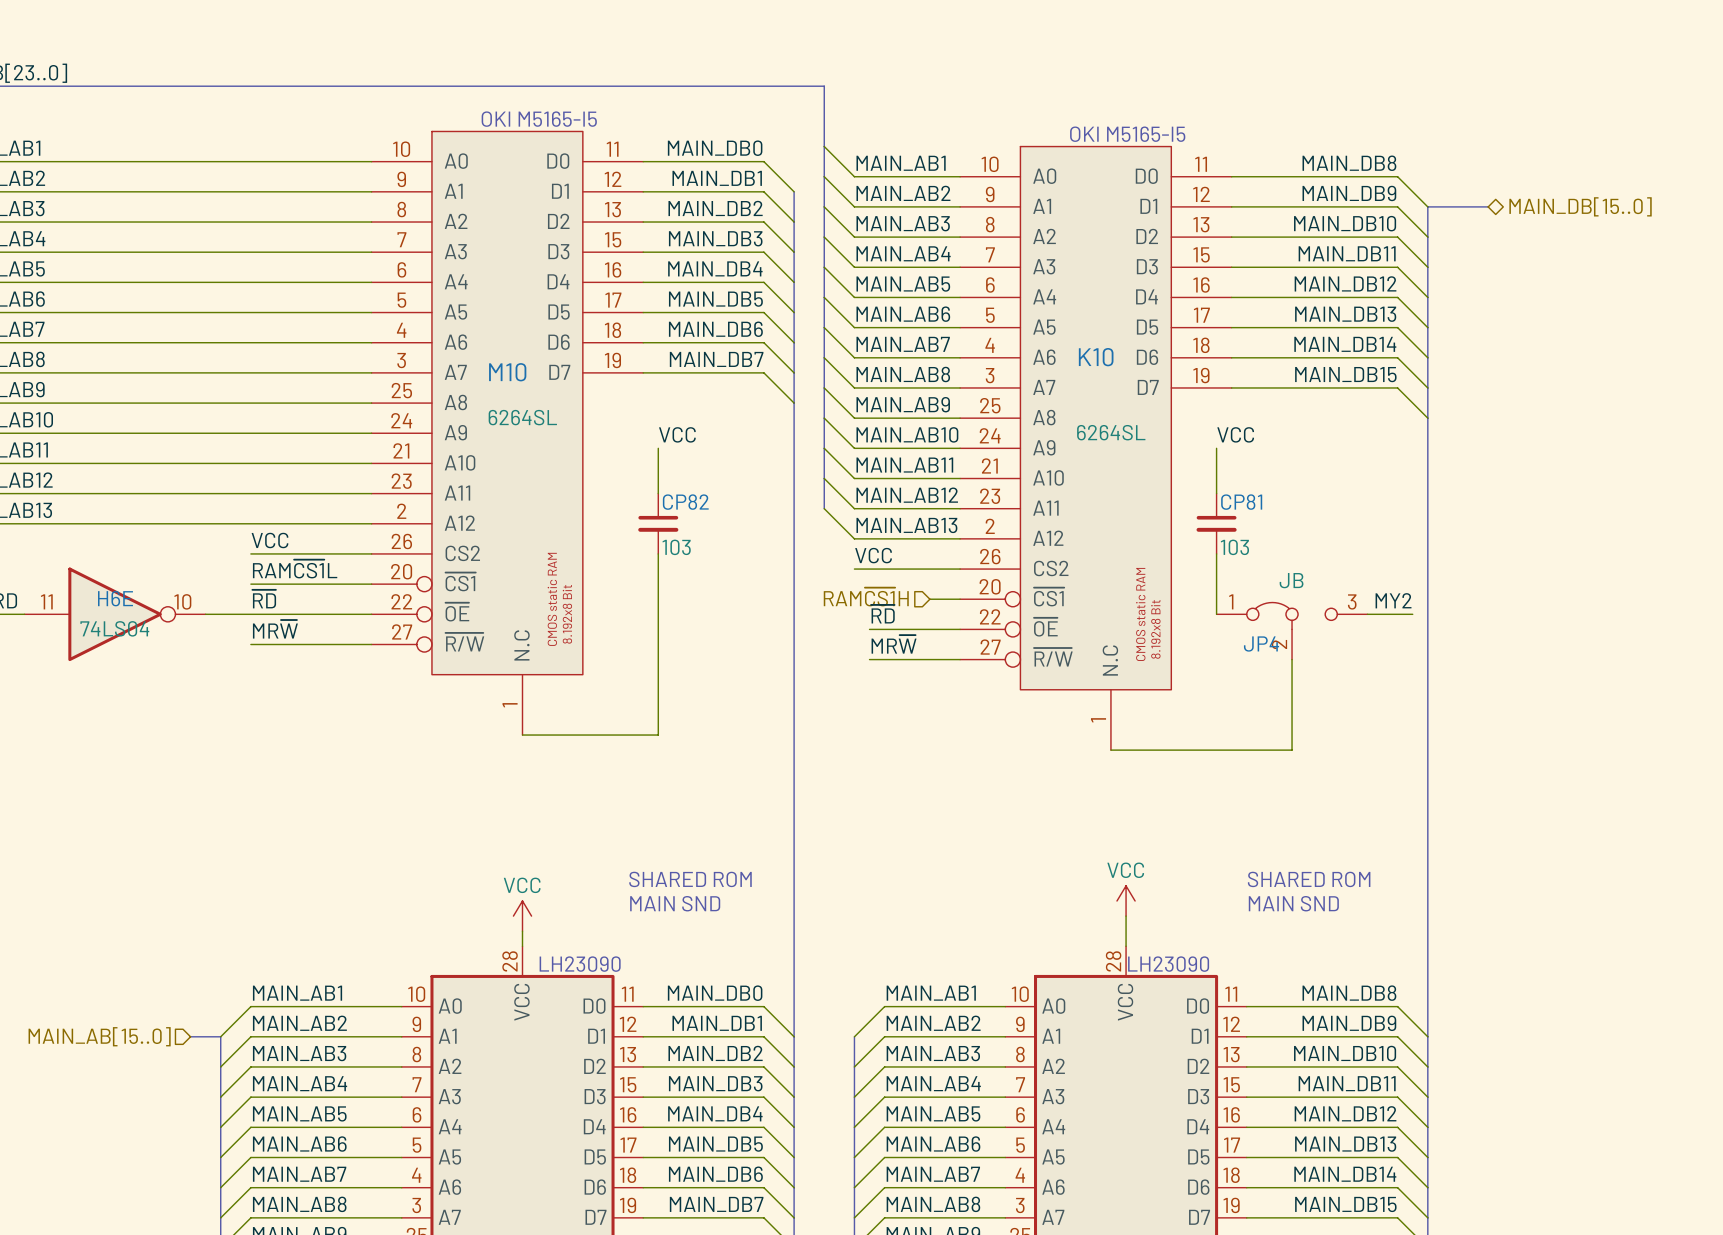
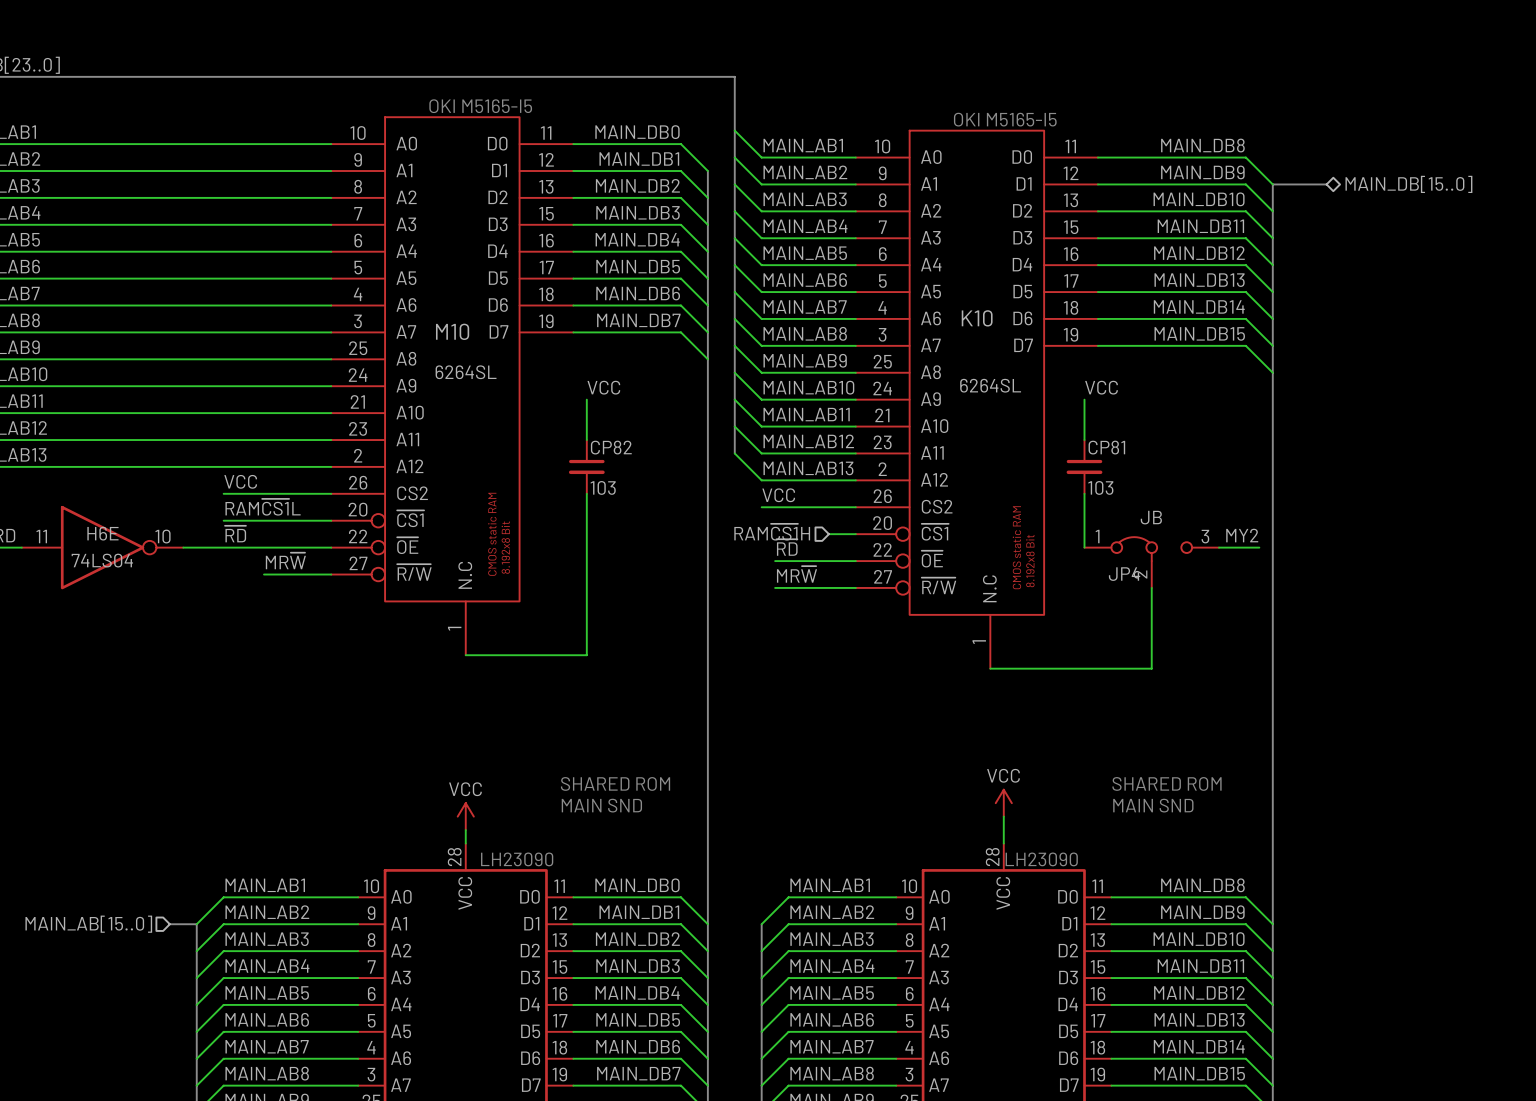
label position: MR~{W} (275, 629) -> MR~{W} (285, 560)
wire: (250, 644) (296, 644) -> none

